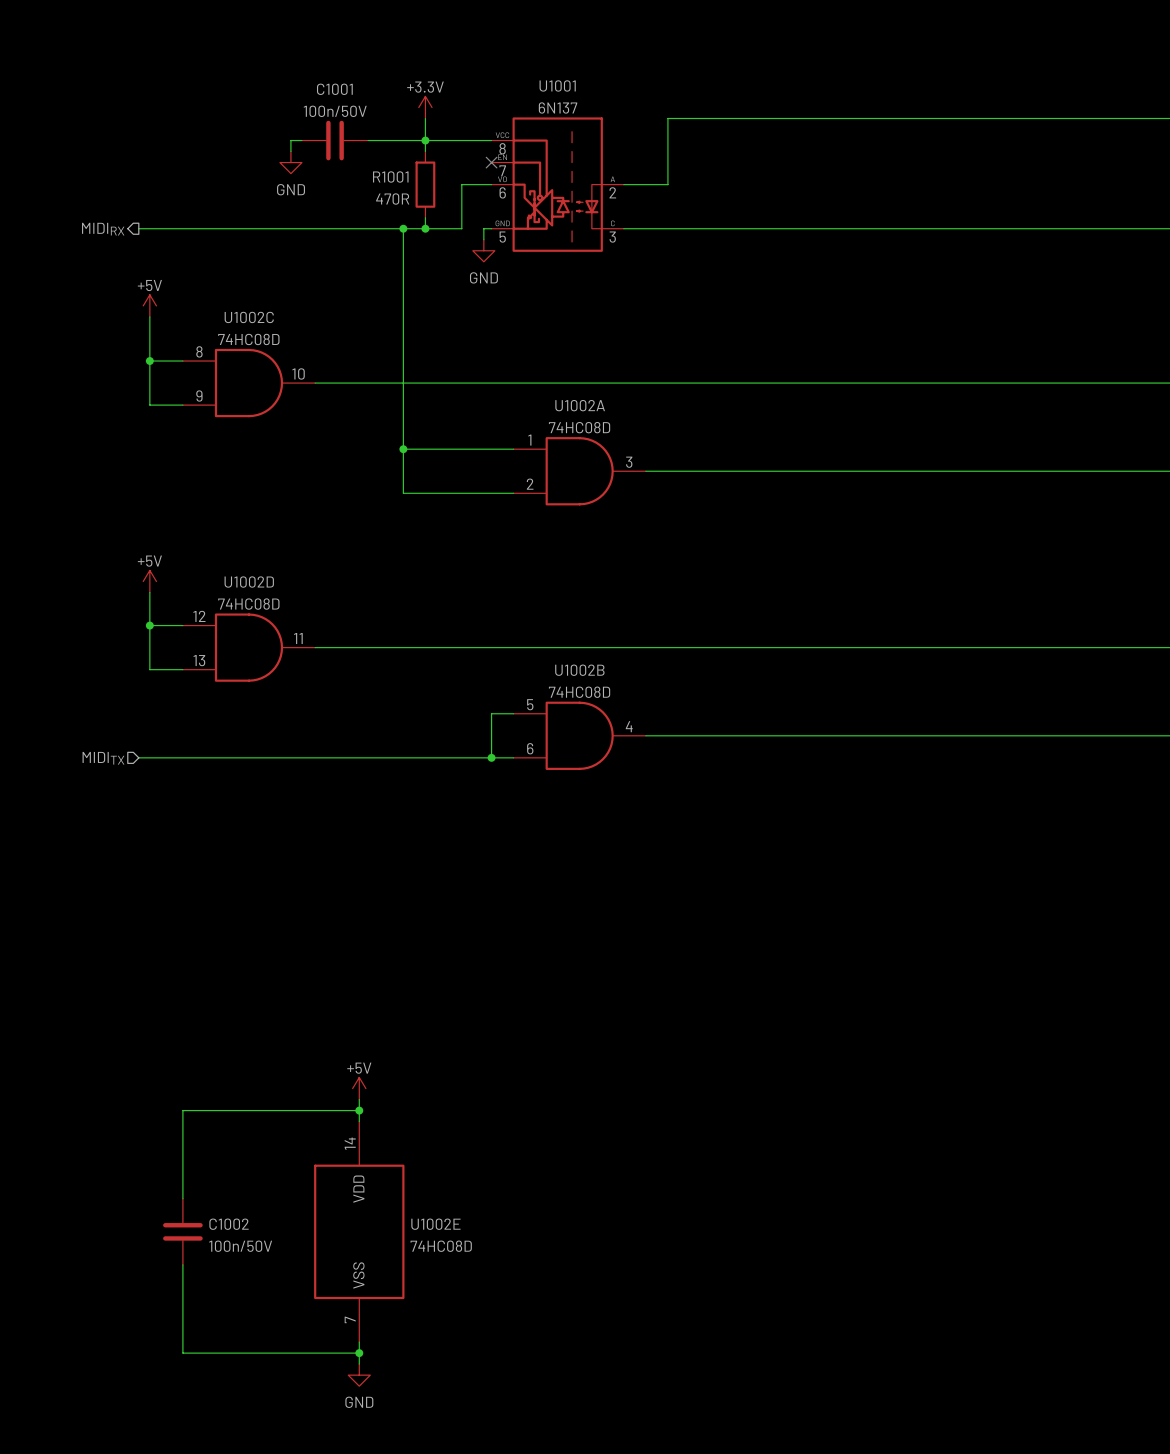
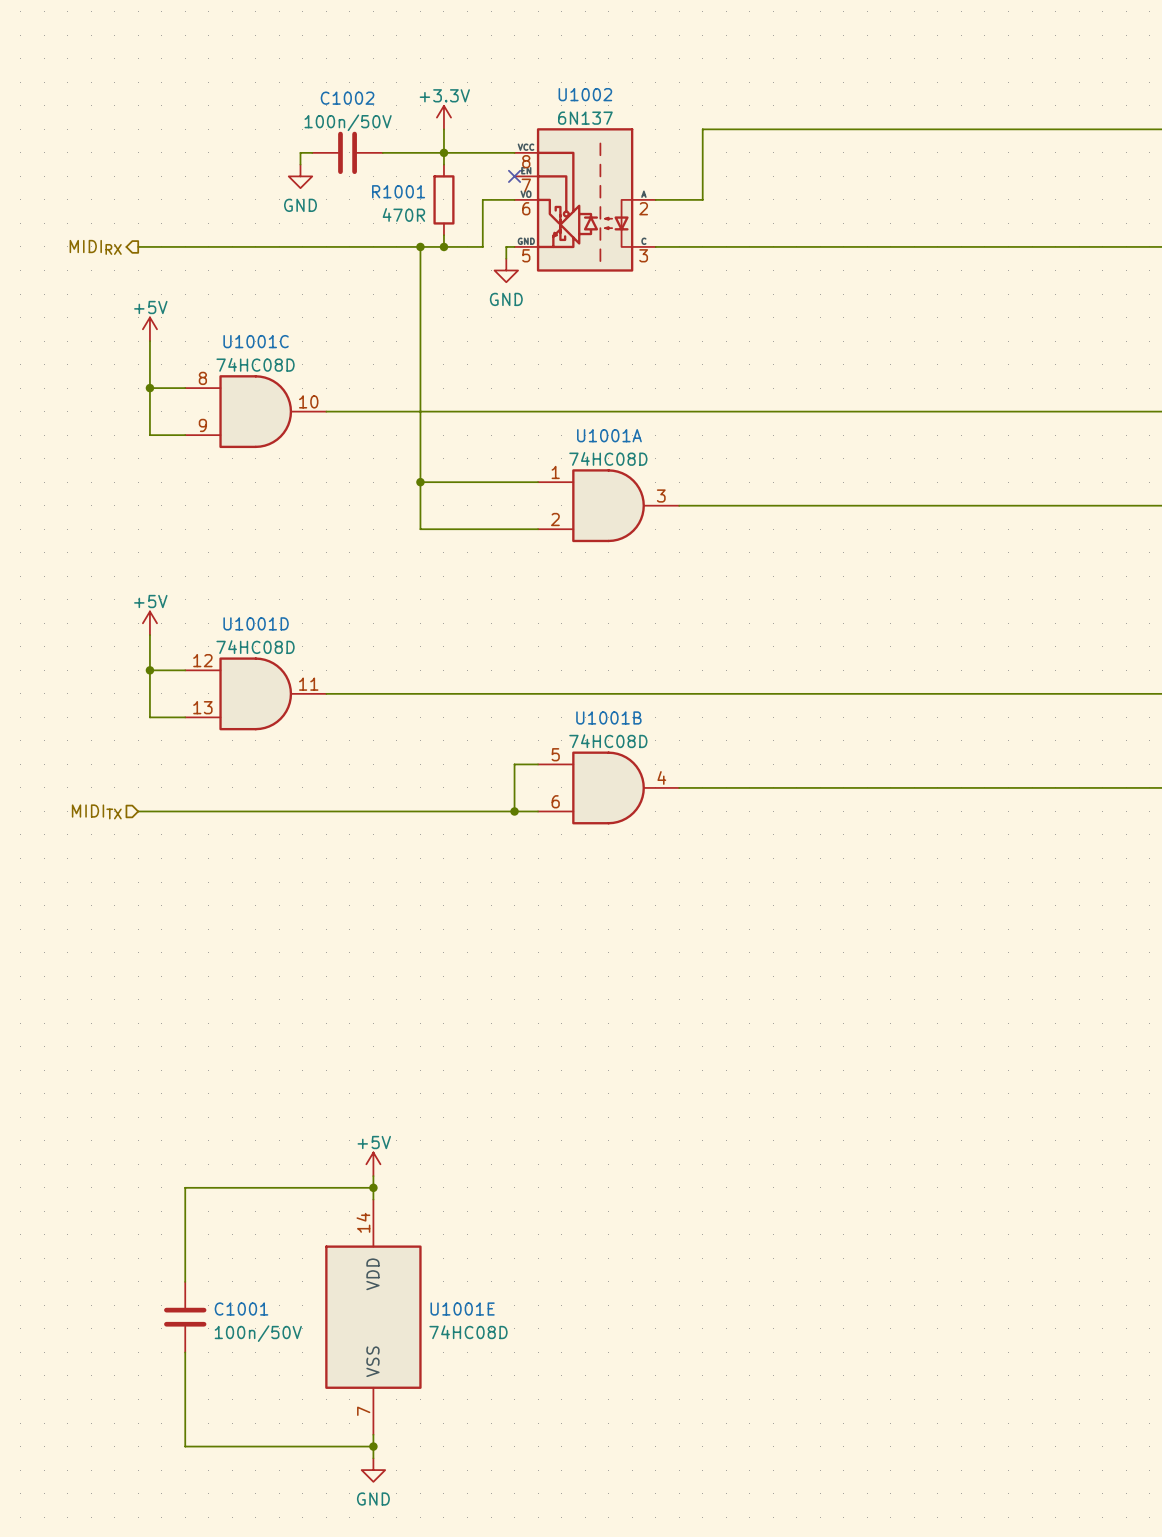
U1001 name: U1001 (557, 85) -> U1002 (585, 94)
C1001 name: C1001 (334, 89) -> C1002 (347, 98)
U1002C name: U1002C (249, 317) -> U1001C (256, 341)
U1002A name: U1002A (580, 405) -> U1001A (609, 435)
U1002D name: U1002D (249, 582) -> U1001D (256, 623)
U1002B name: U1002B (579, 670) -> U1001B (608, 717)
C1002 name: C1002 (229, 1224) -> C1001 (241, 1309)
U1002E name: U1002E (435, 1224) -> U1001E (462, 1309)

